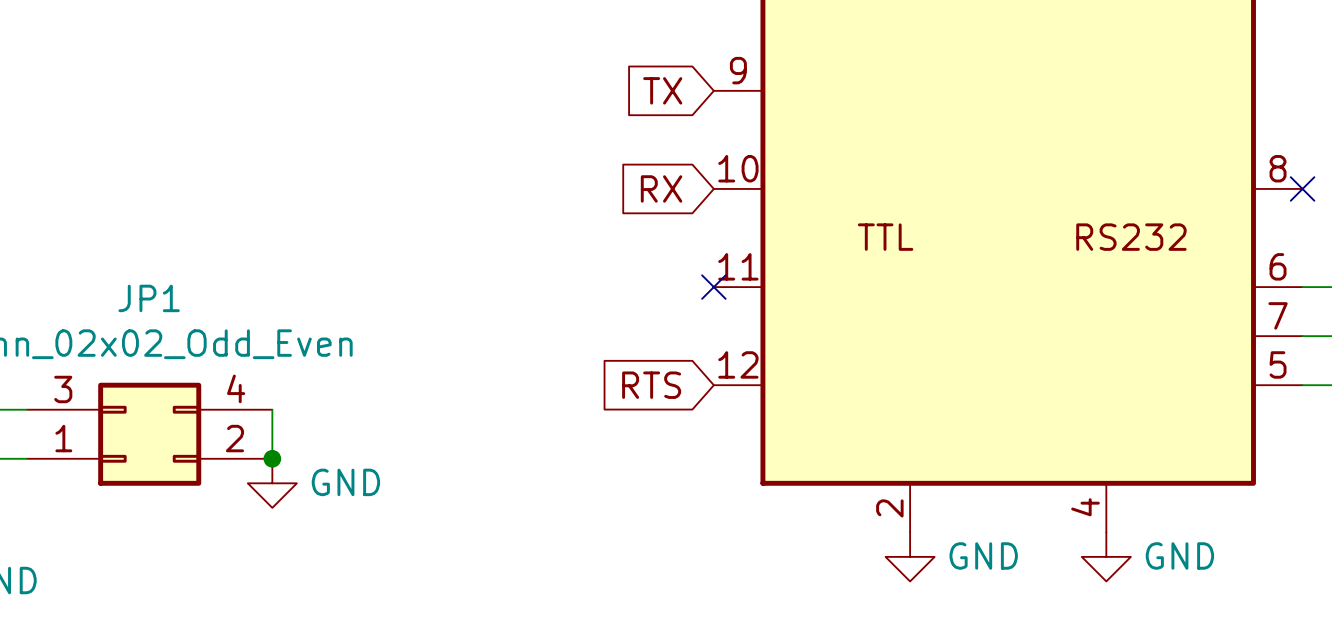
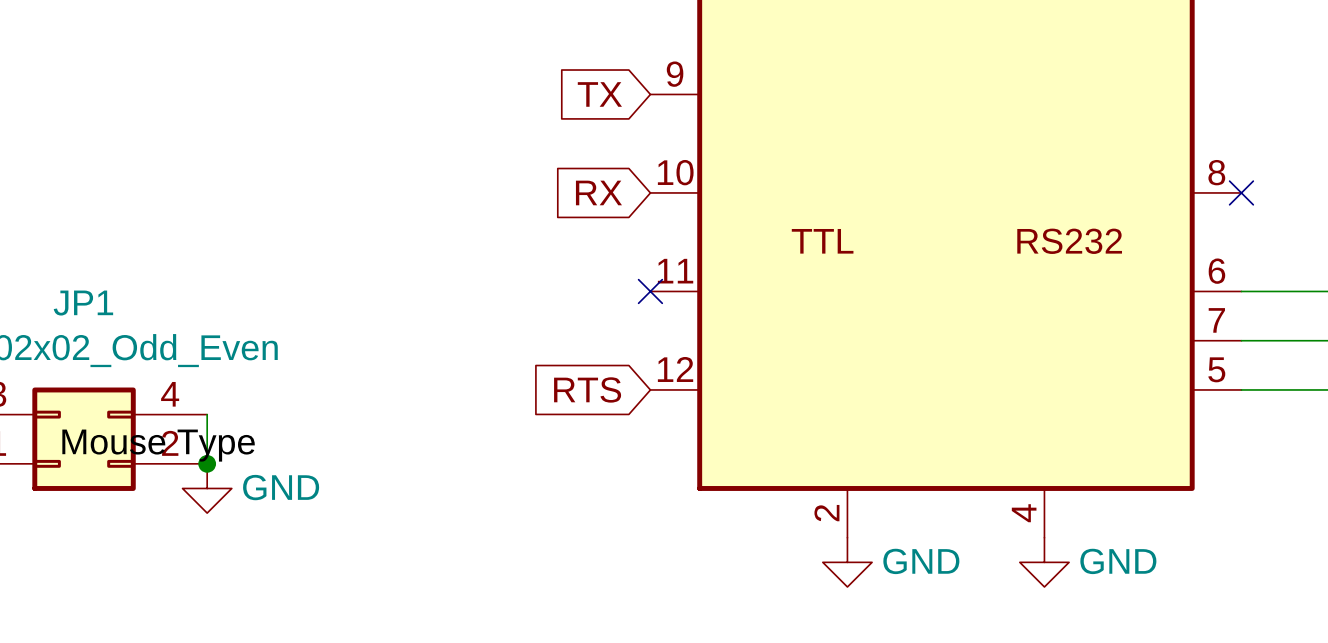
label: none -> Mouse Type (158, 445)

